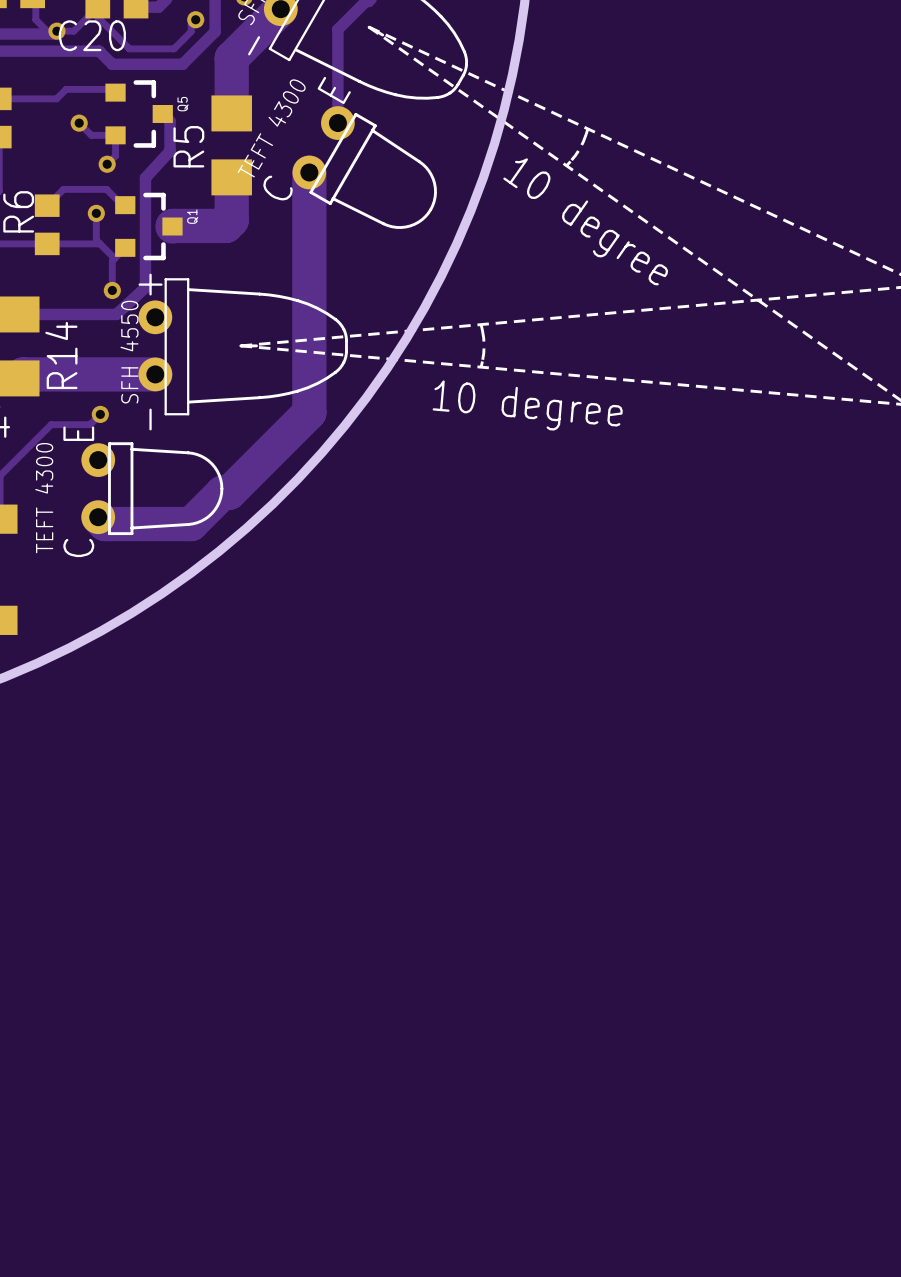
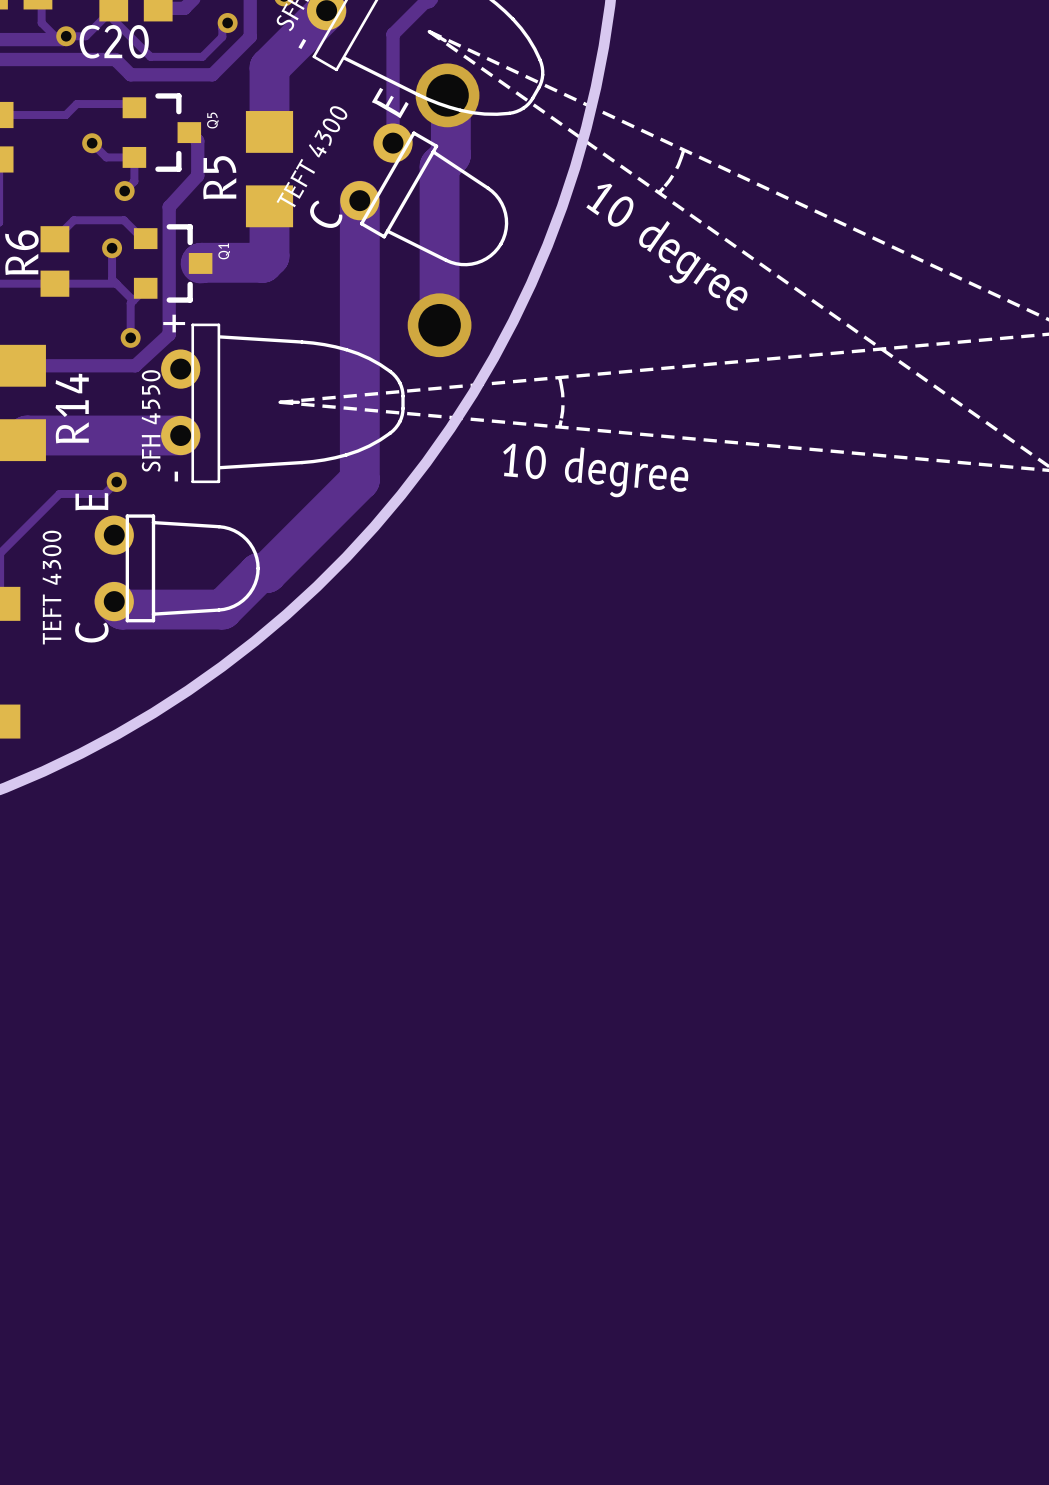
track: none -> (447, 95) (450, 98) (450, 155) (439, 166) (439, 325)
via: none -> (447, 95)
via: none -> (439, 325)

